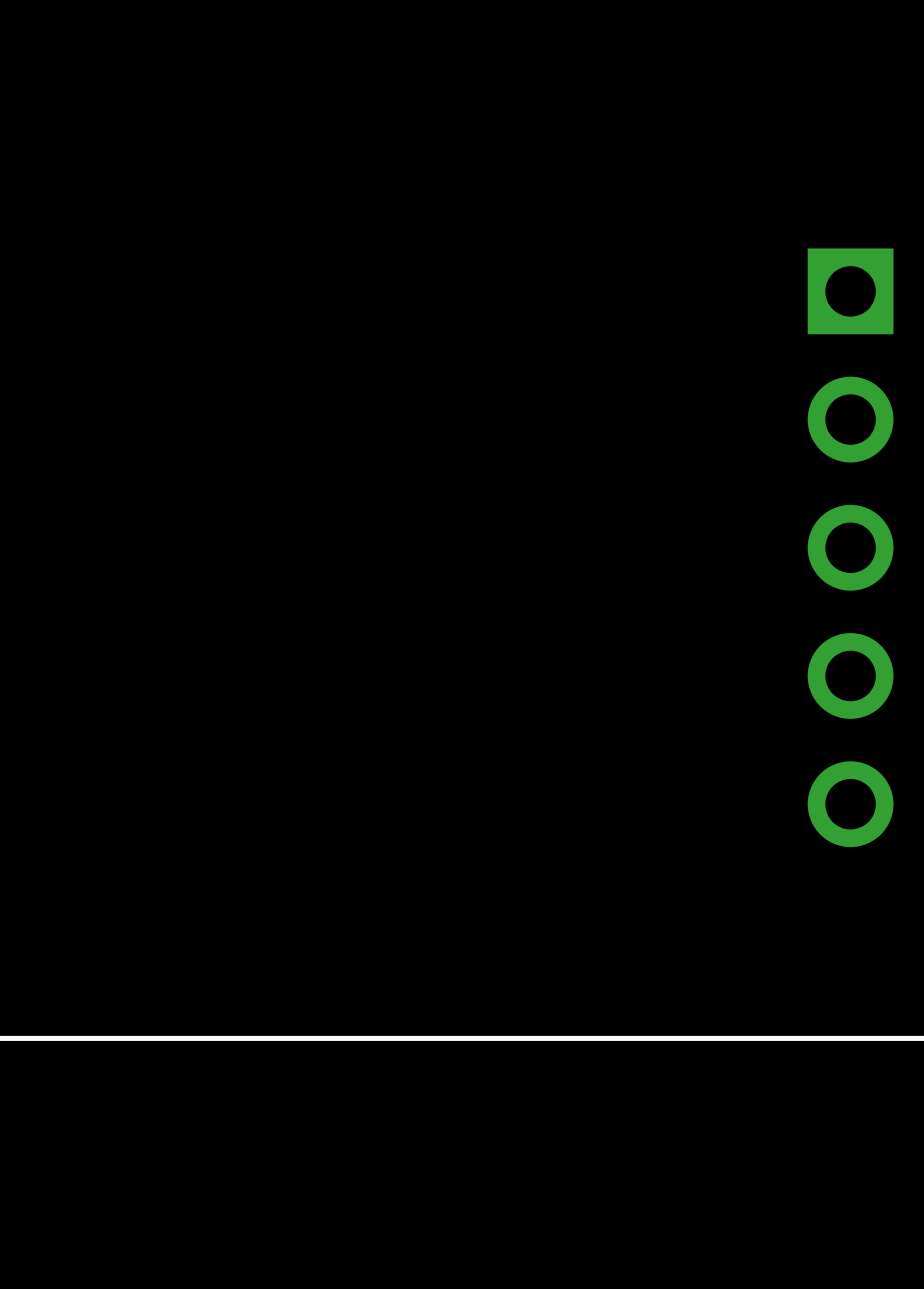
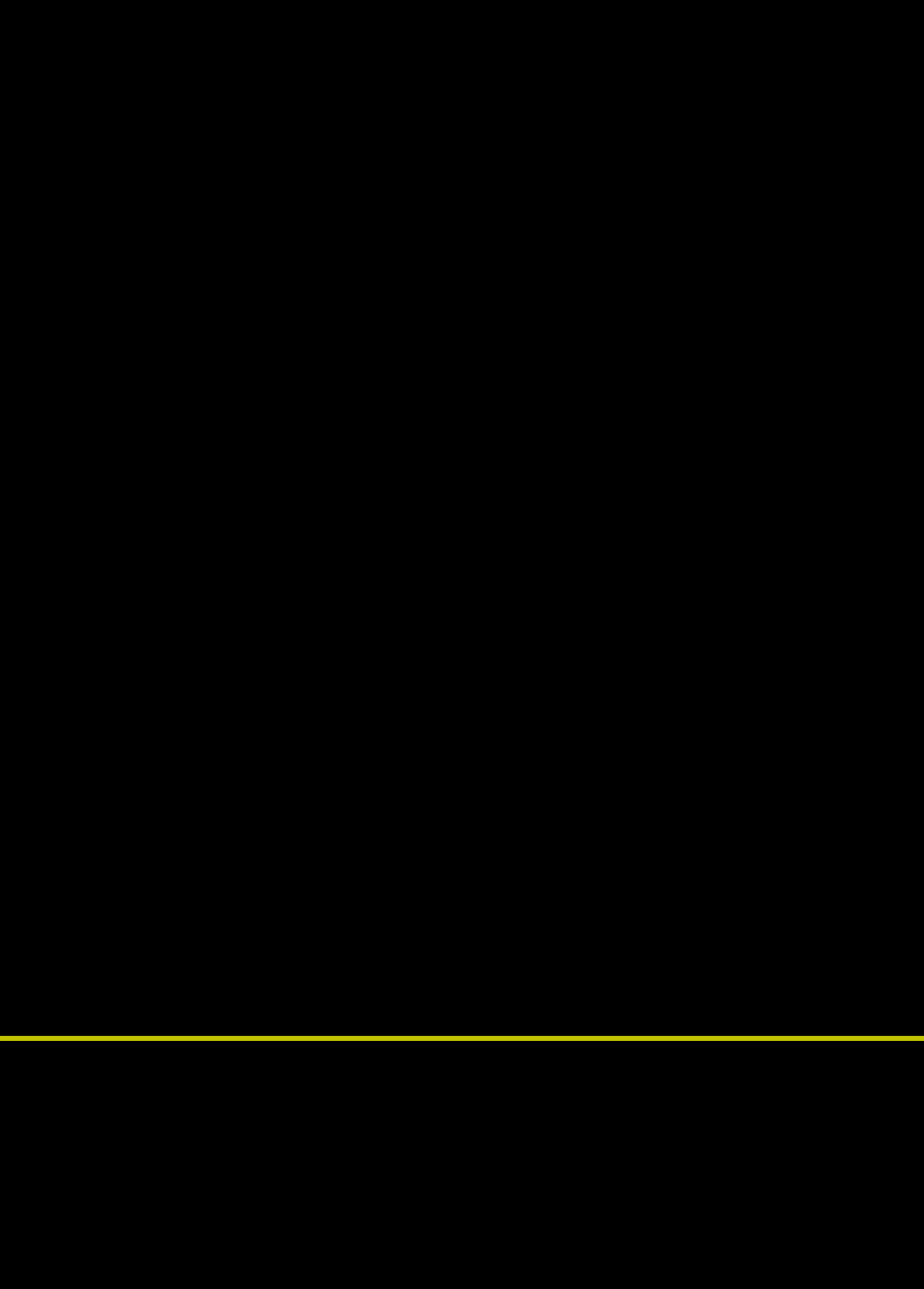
part: (850, 547) -> none

